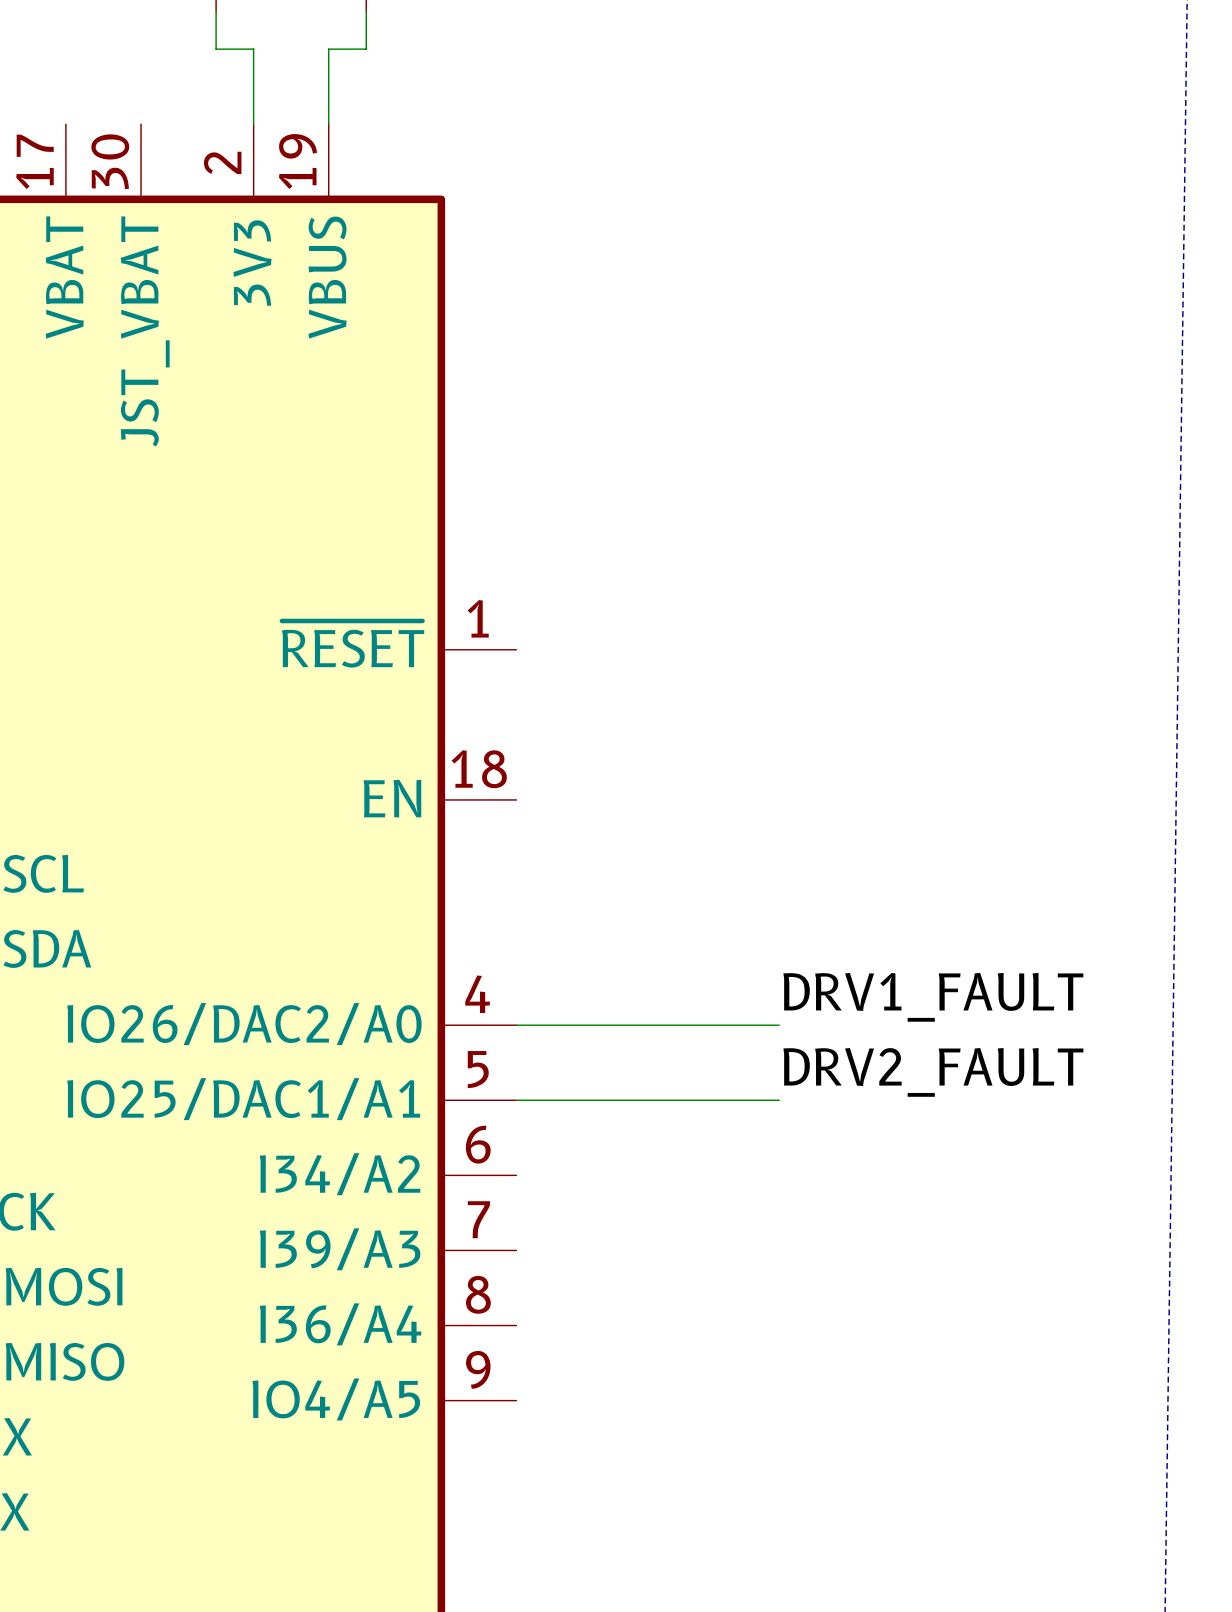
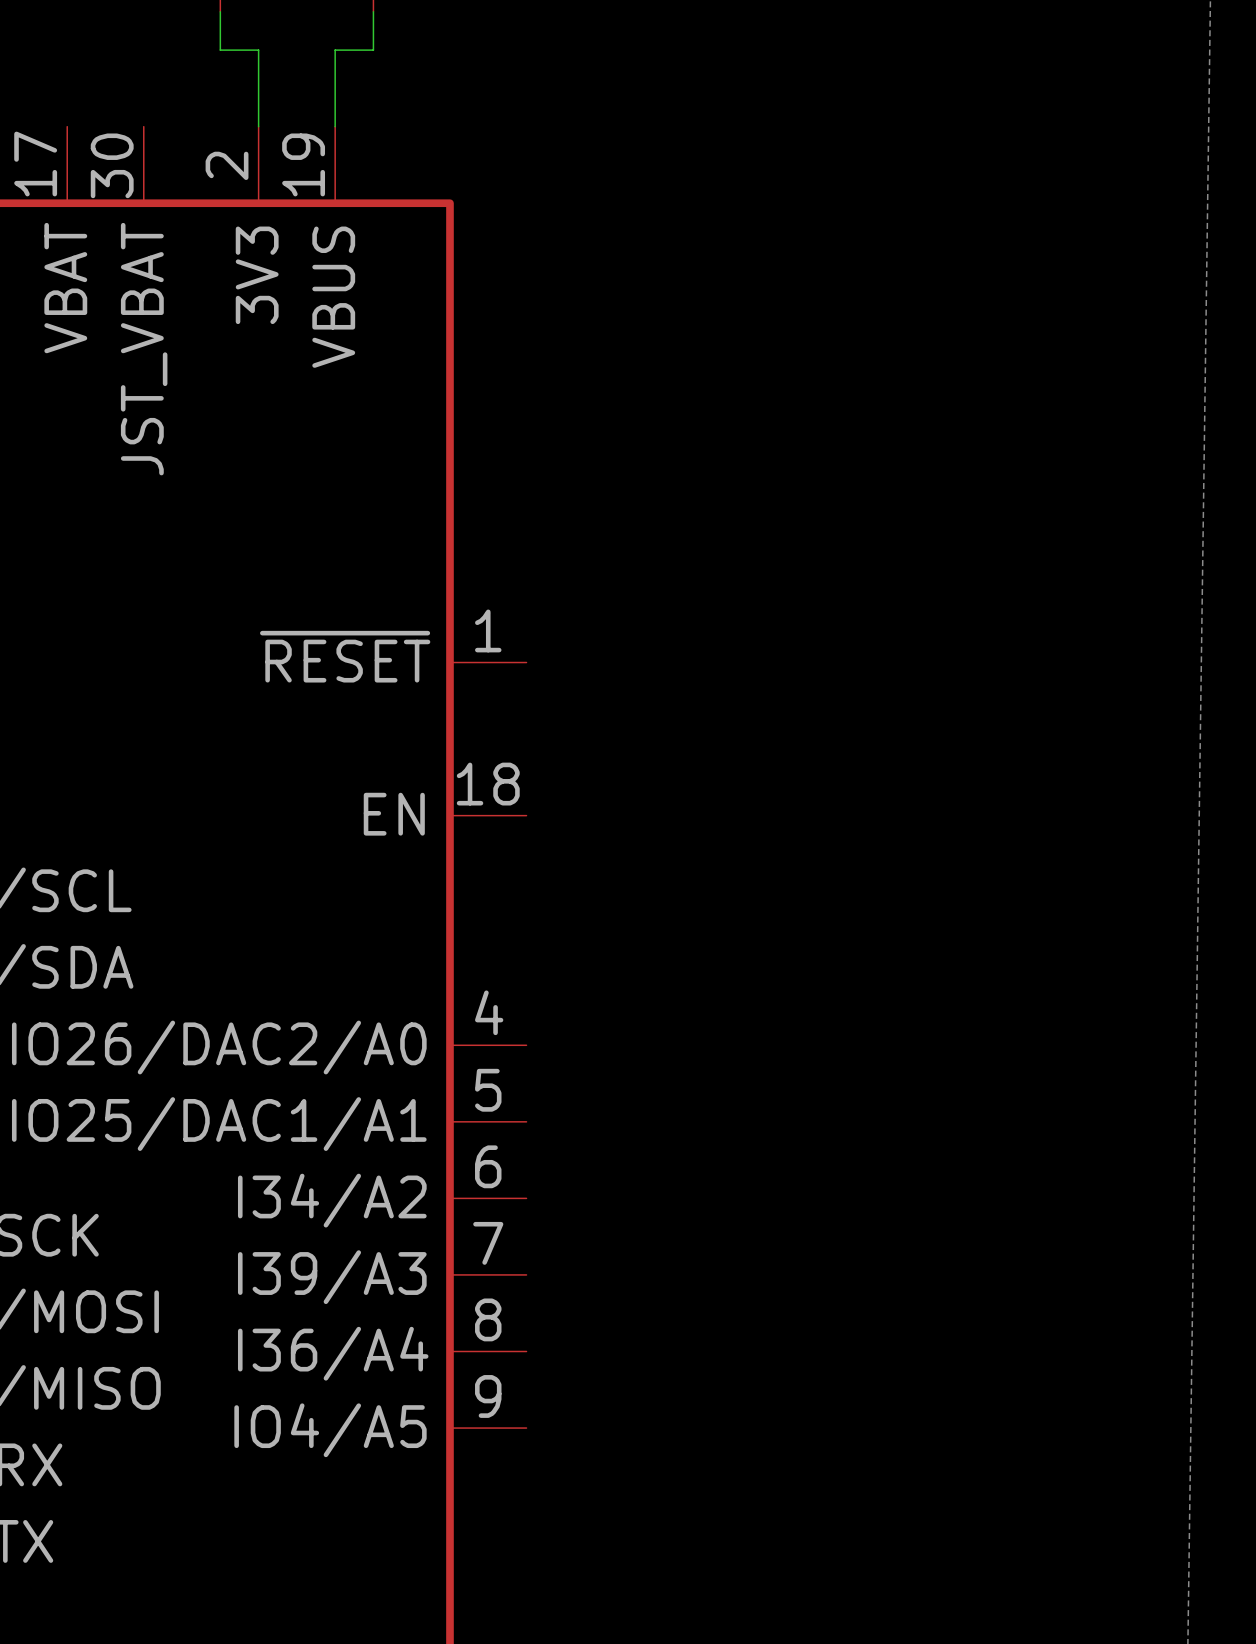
label: DRV1_FAULT (933, 997) -> none
wire: (516, 1025) (779, 1025) -> none
label: DRV2_FAULT (933, 1072) -> none
wire: (516, 1100) (779, 1100) -> none

